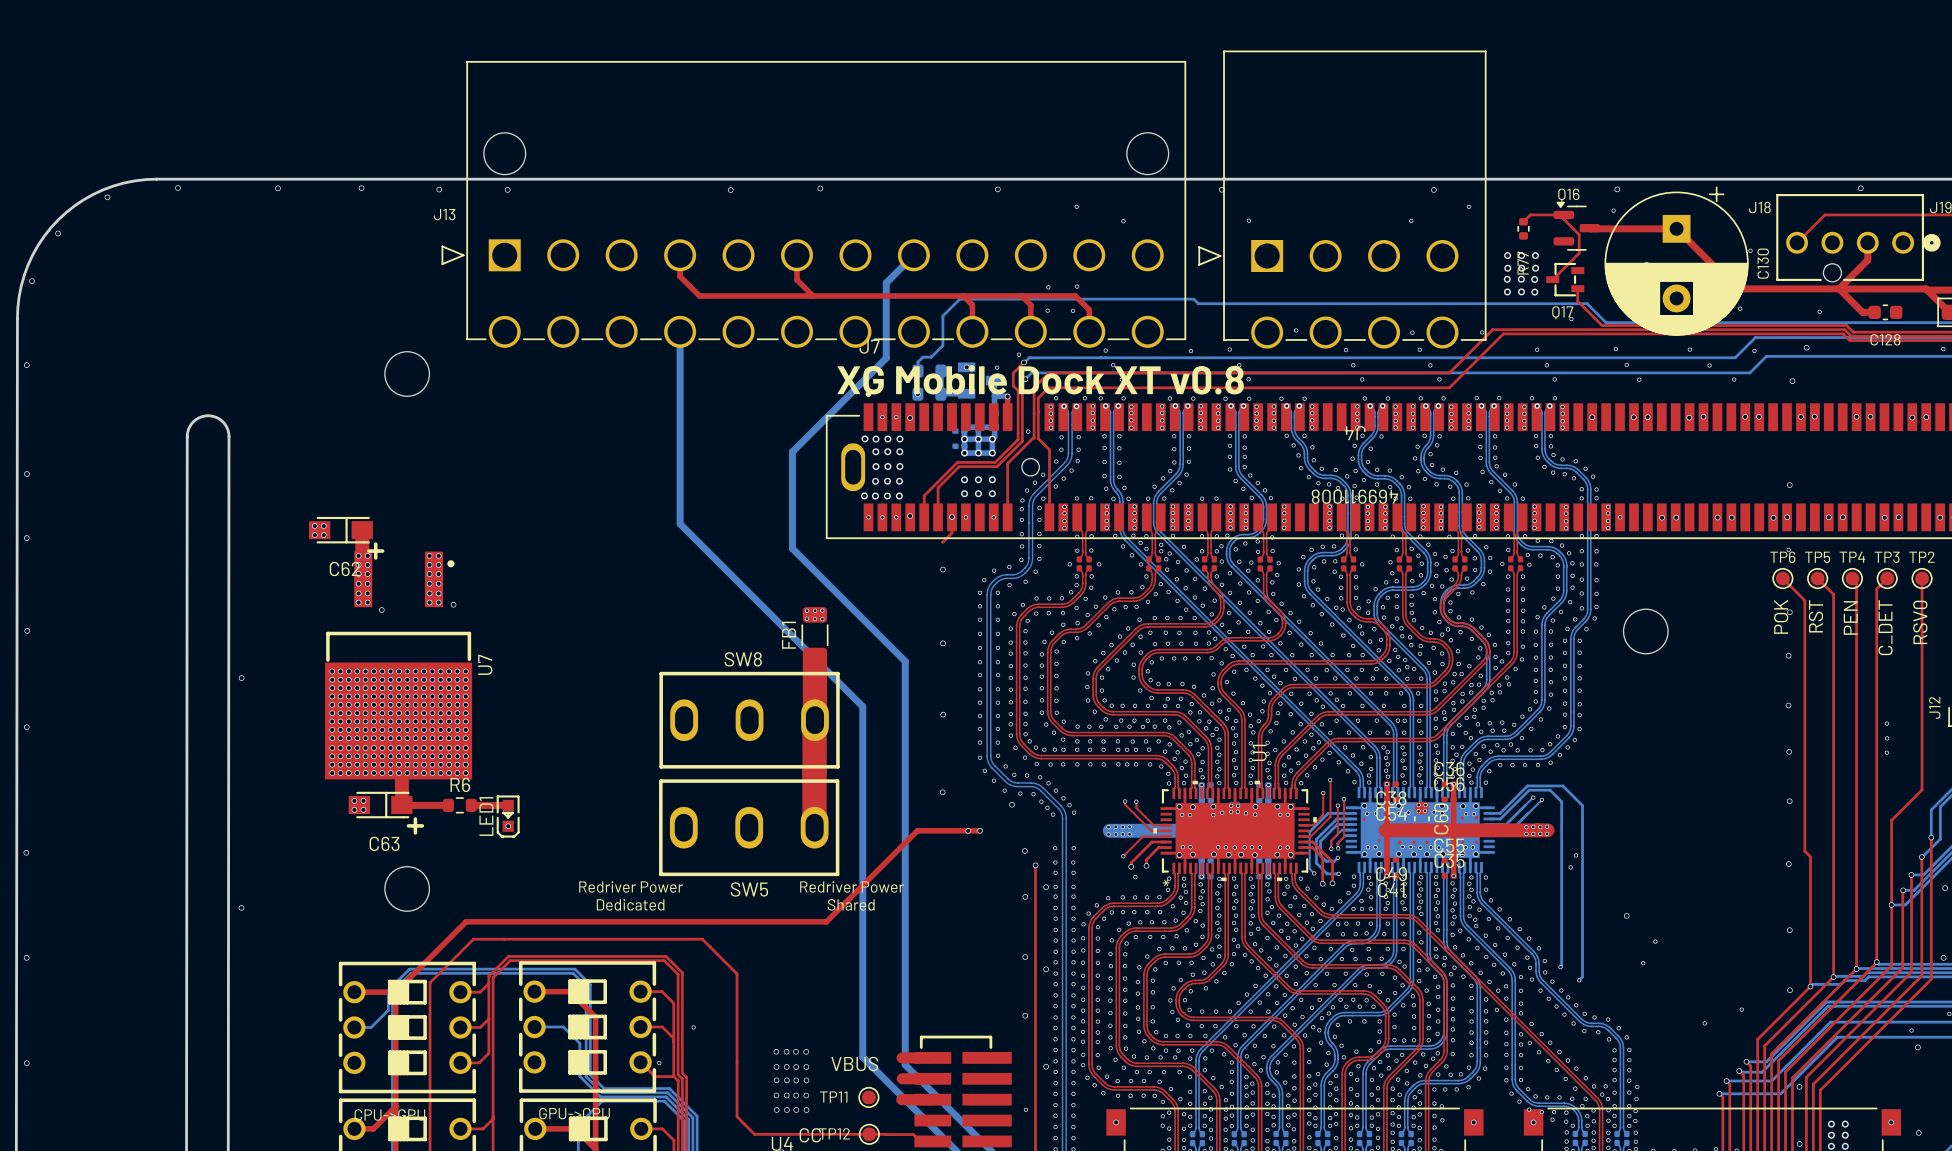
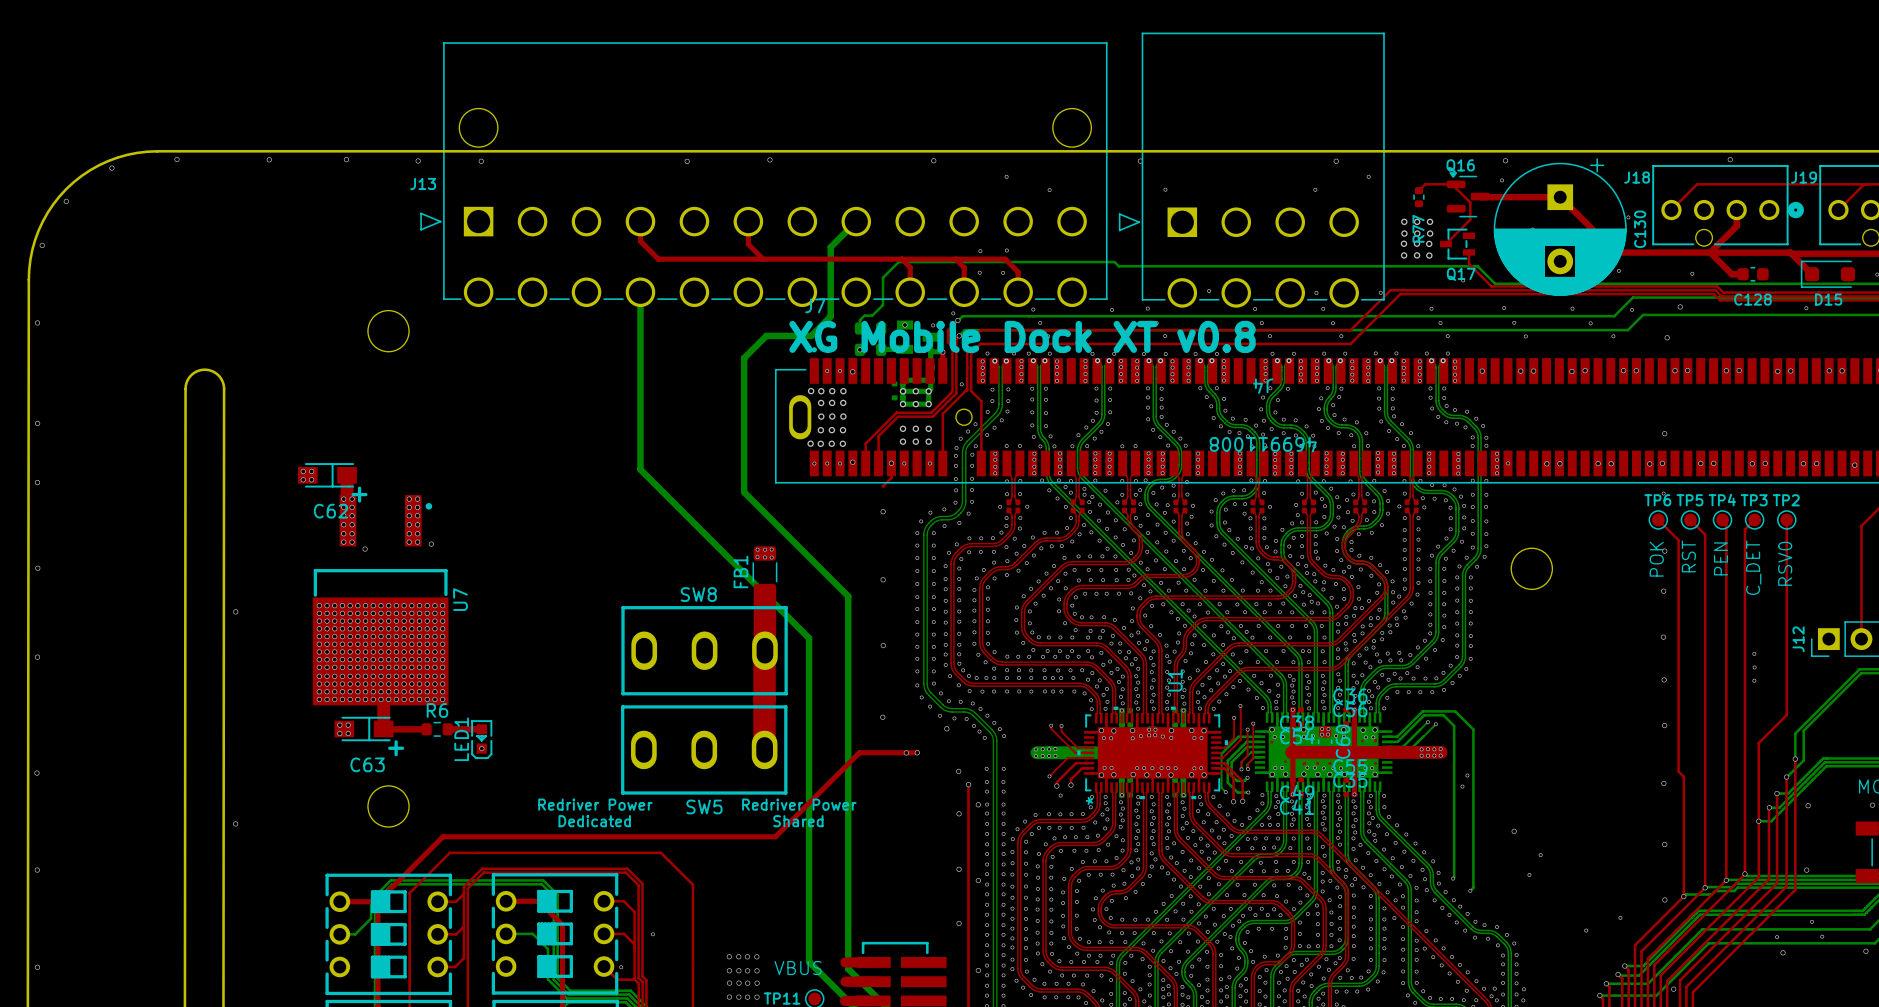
bottom track: (865, 379) (792, 451) -> (811, 335) (766, 335) (744, 358) (744, 403)
bottom track: (978, 427) (978, 453) -> none

